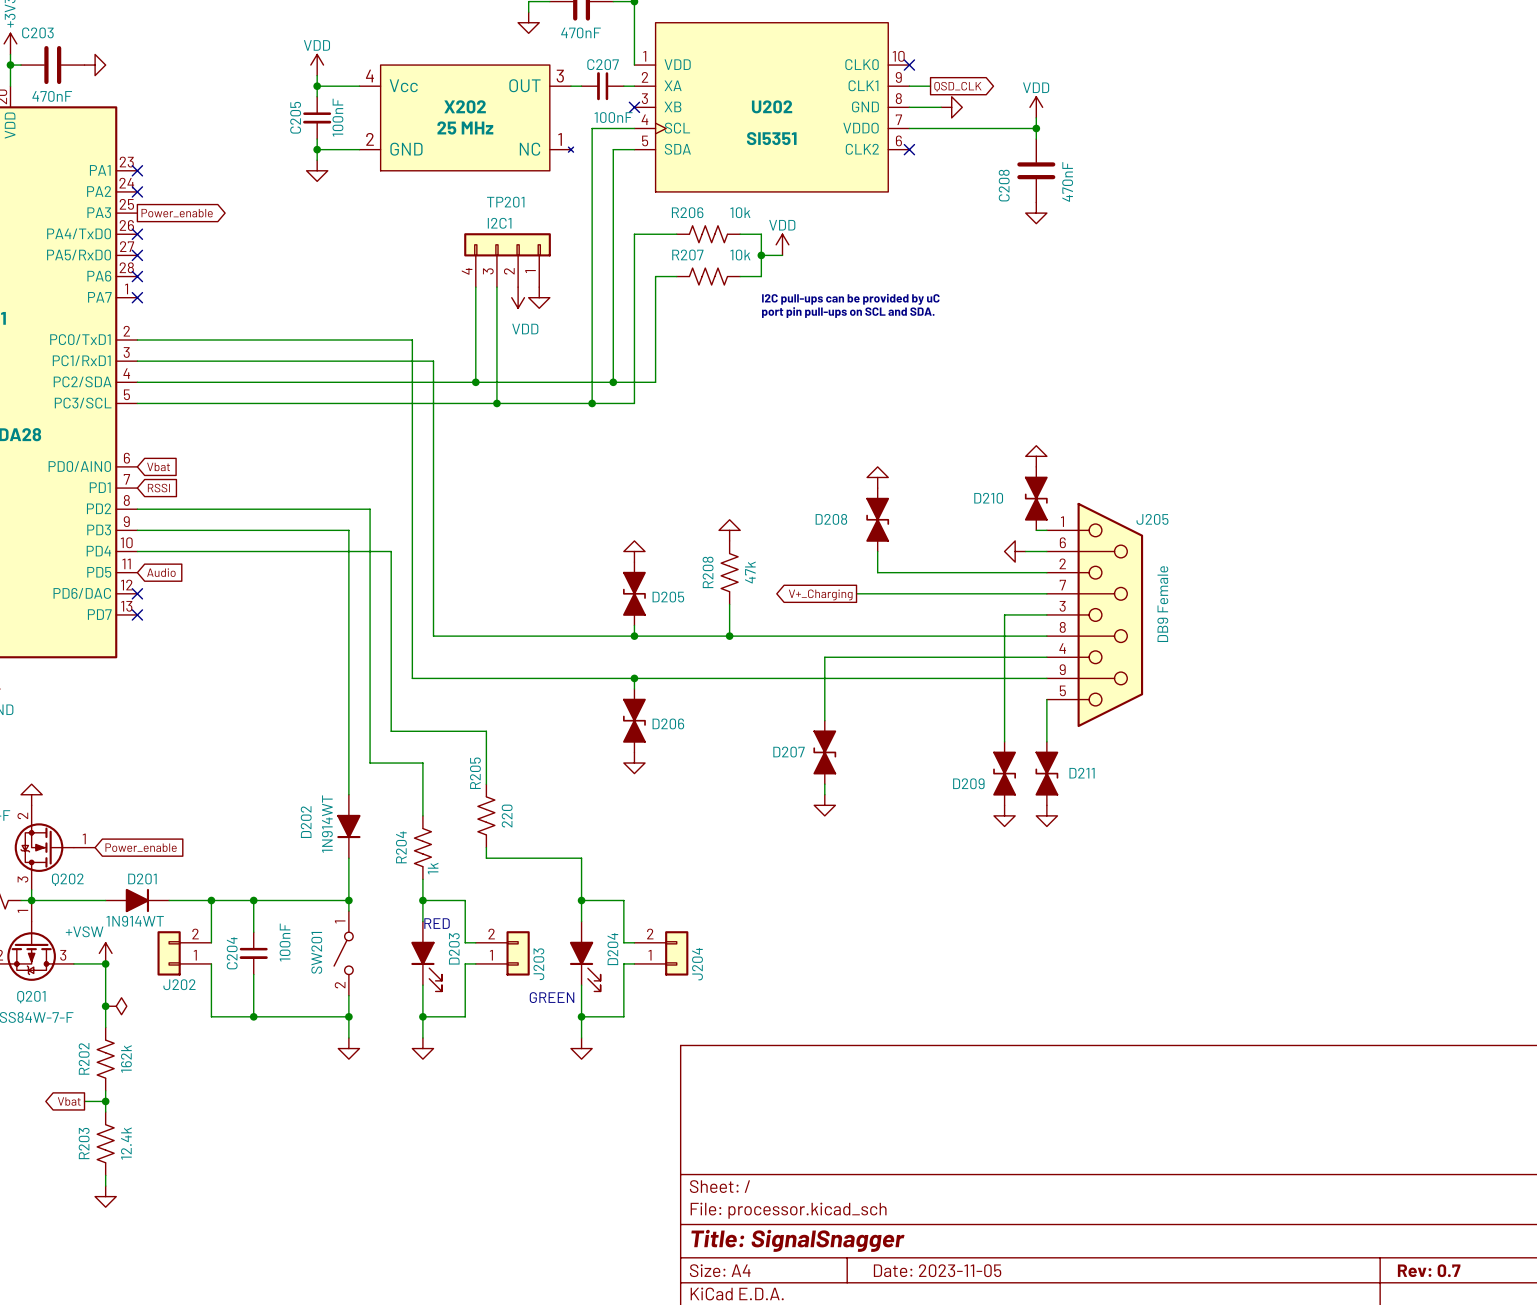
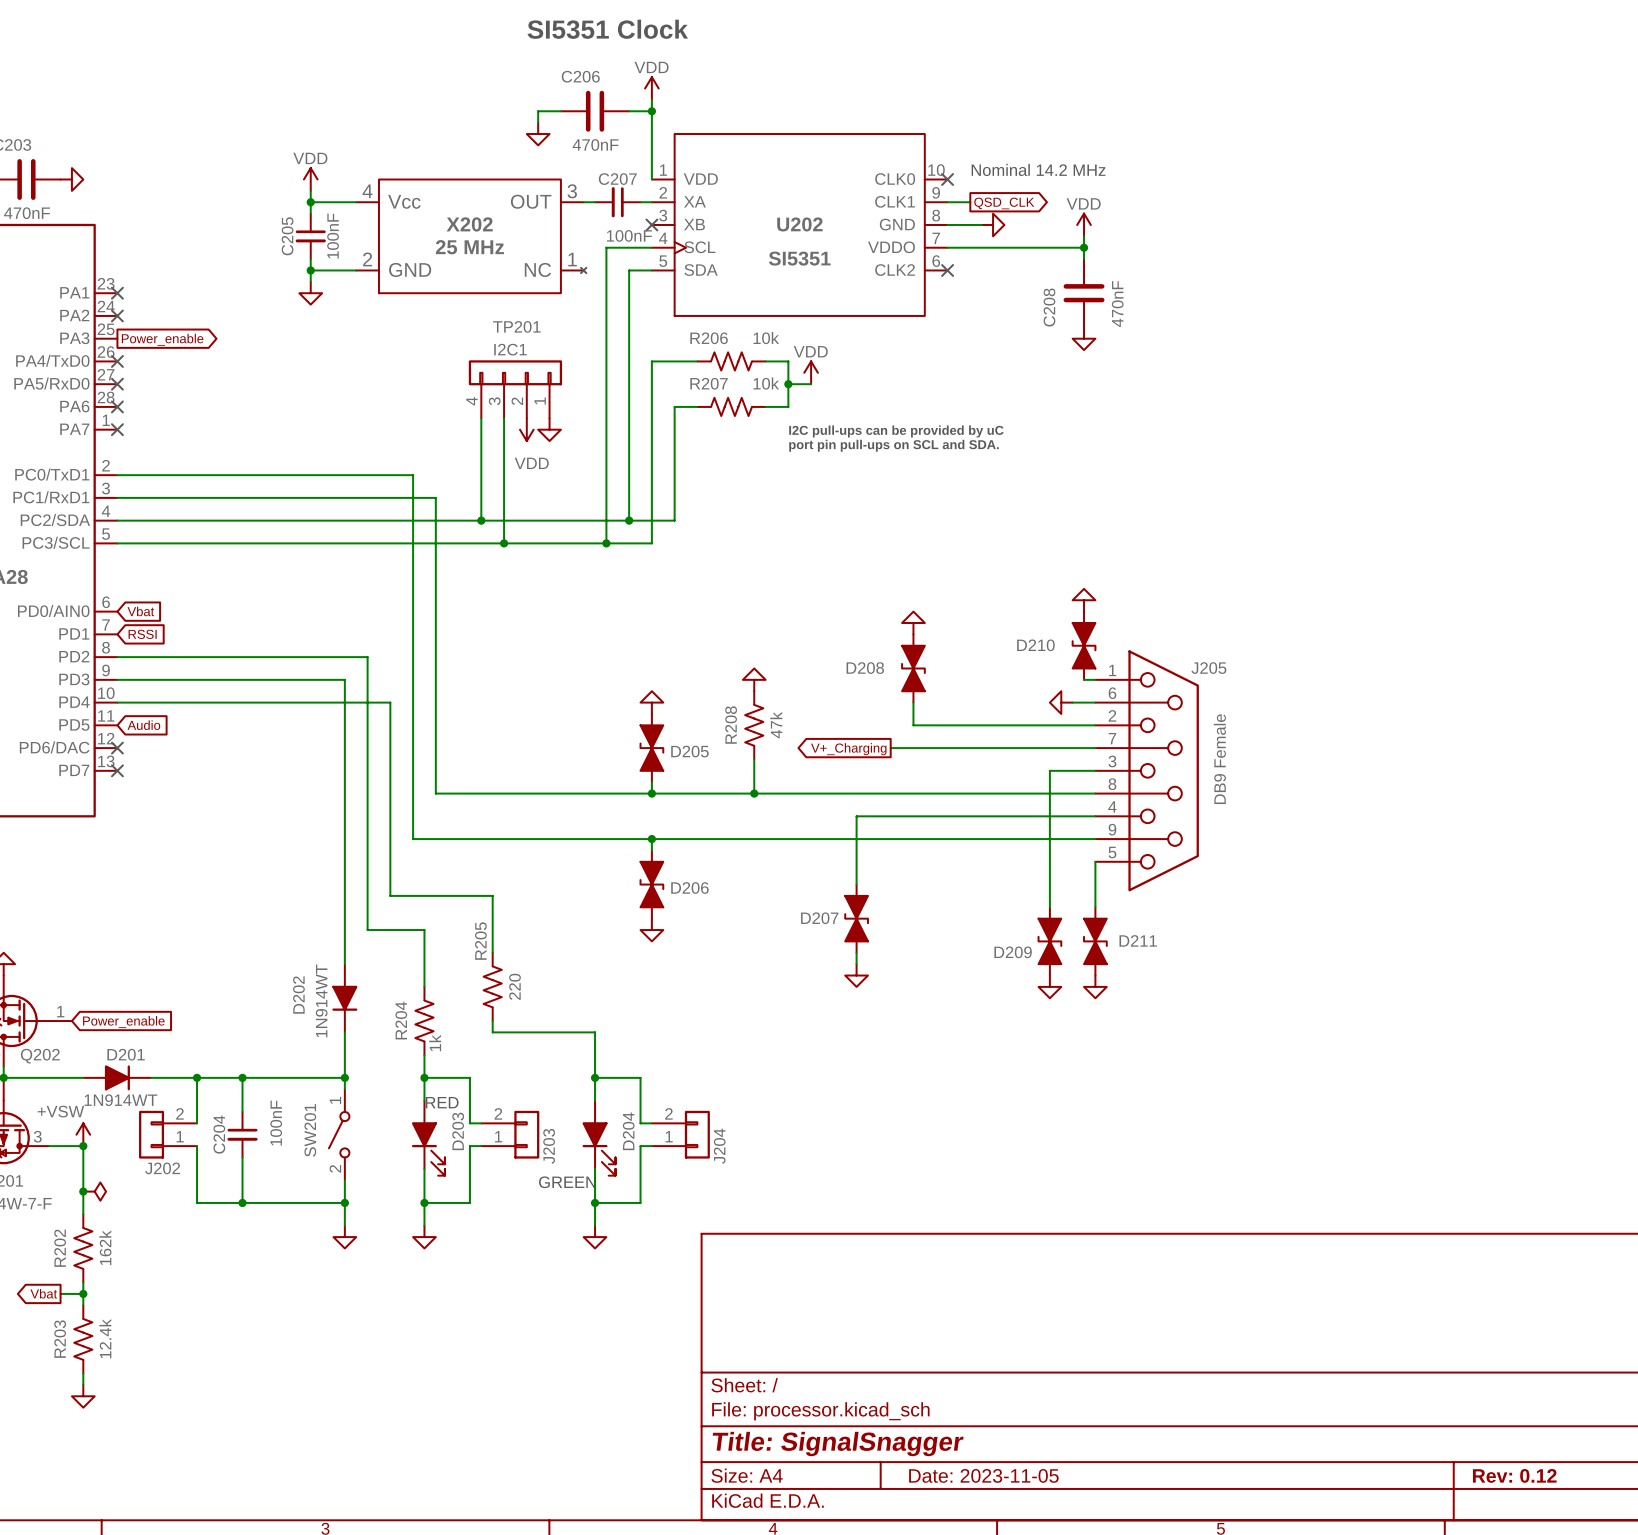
text: none -> Nominal 14.2 MHz (1038, 169)
title block: Rev: 0.7 (1429, 1270) -> Rev: 0.12 (1514, 1475)

